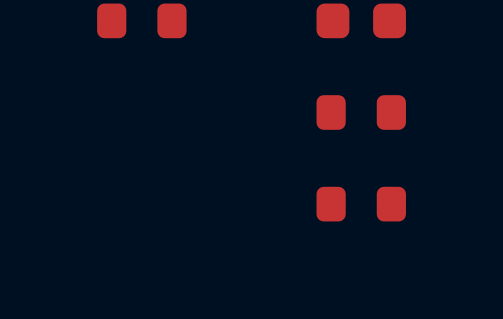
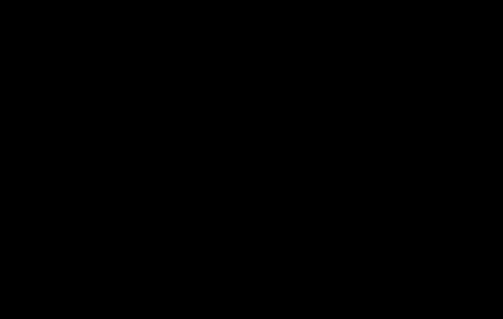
part: (141, 20) -> none
part: (361, 20) -> none
part: (361, 112) -> none
part: (361, 204) -> none

